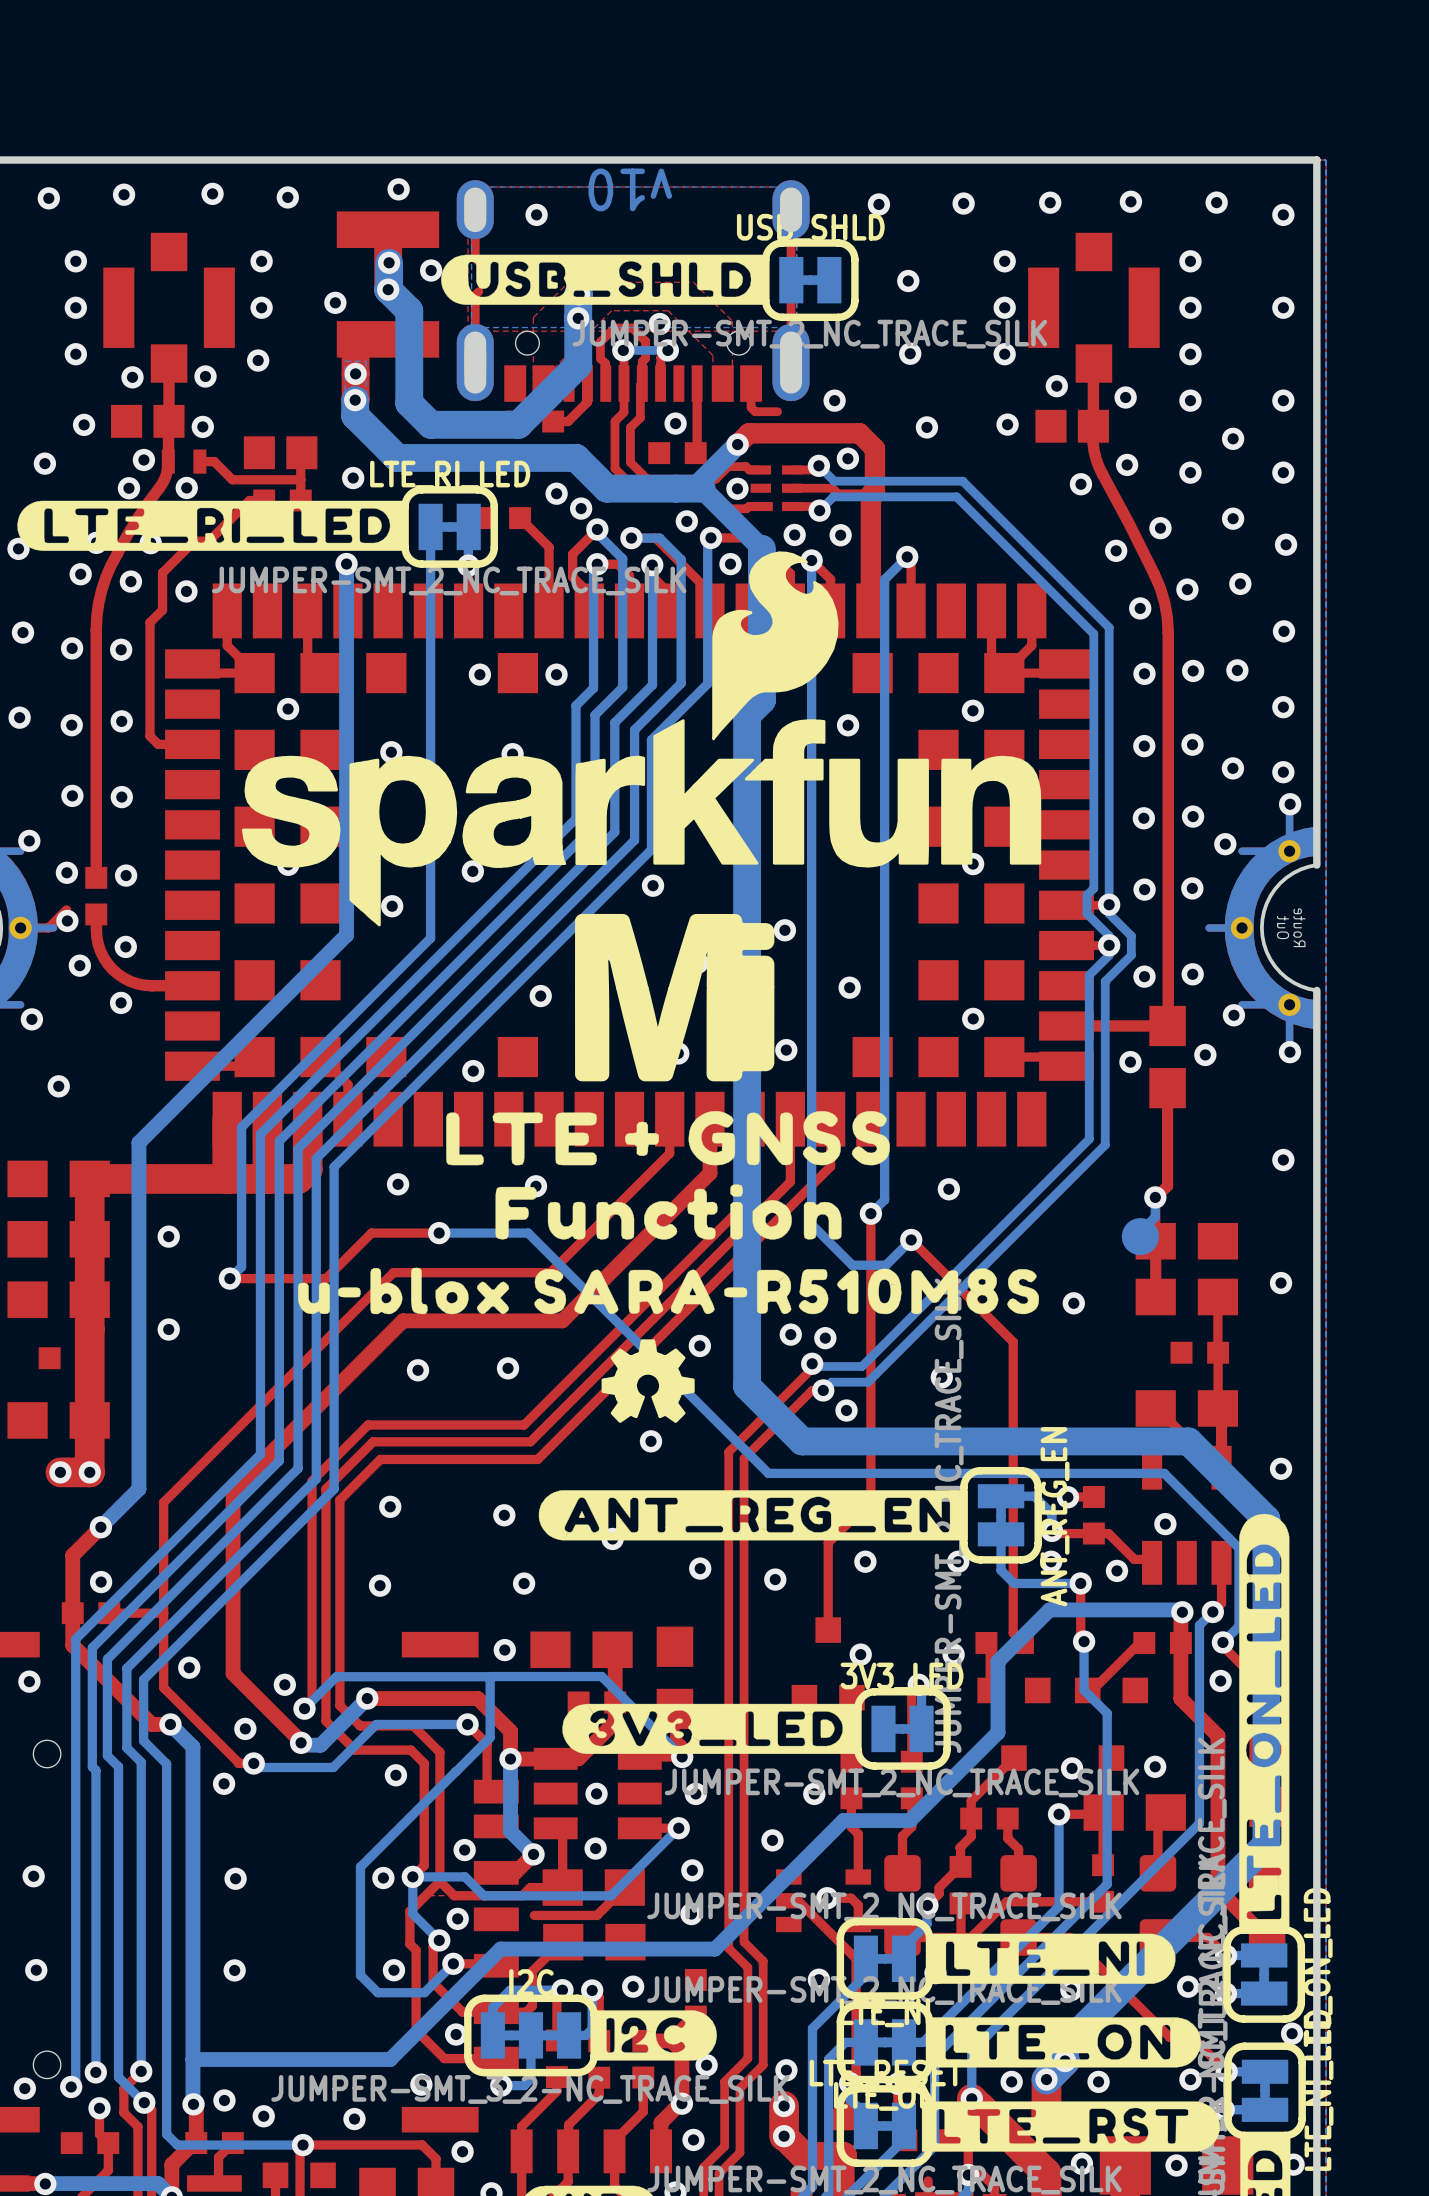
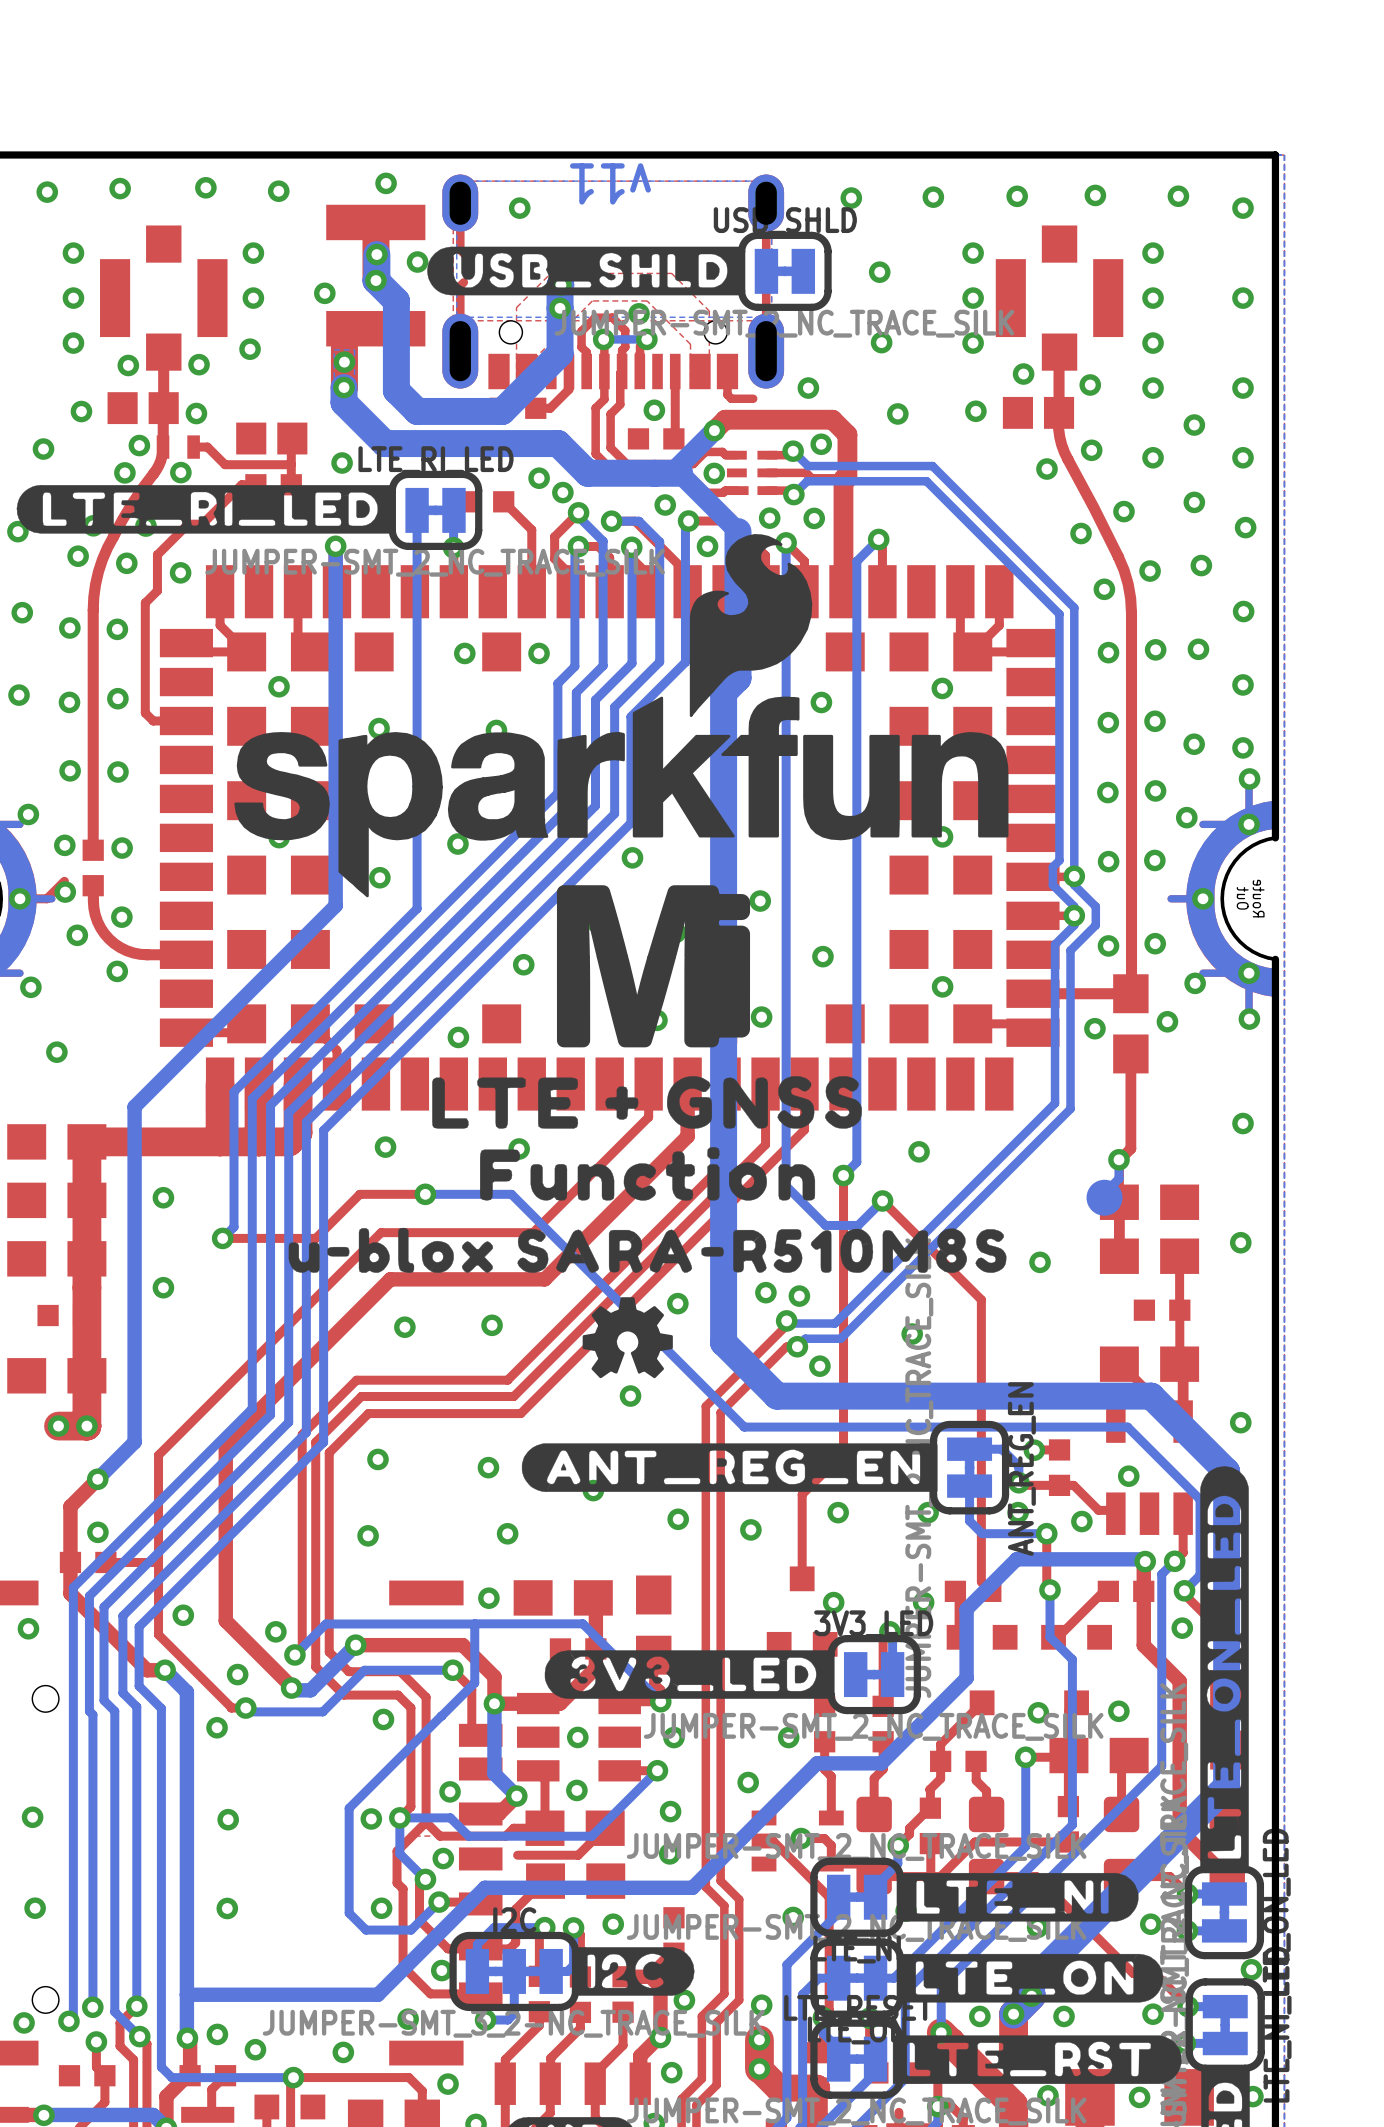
text: v10 (630, 189) -> v11 (610, 183)

